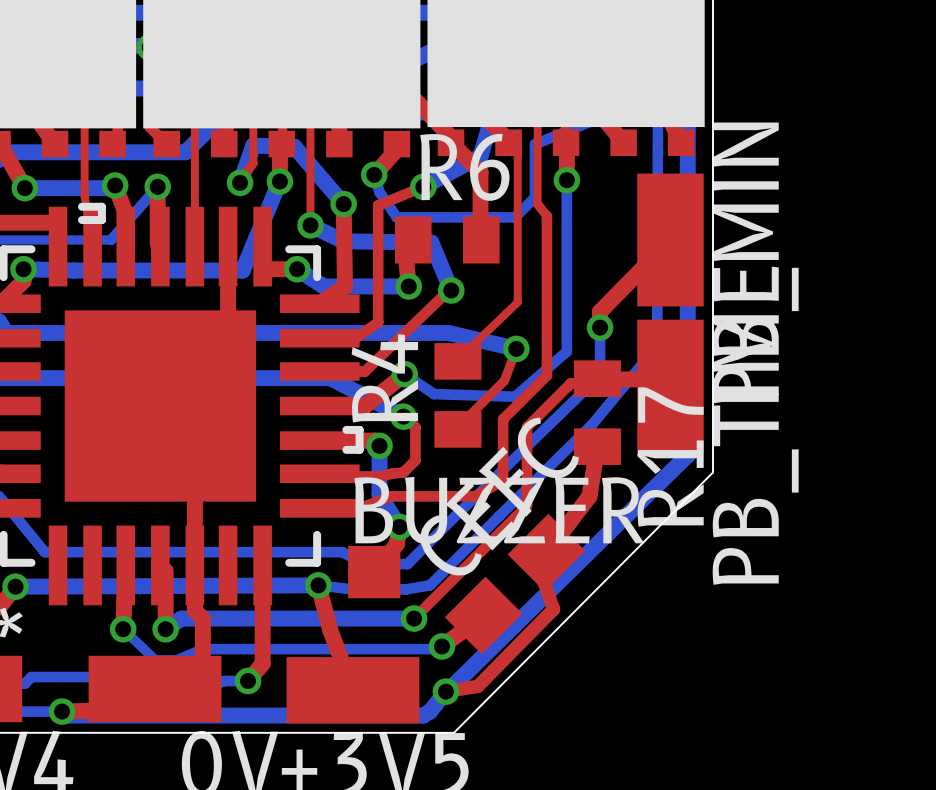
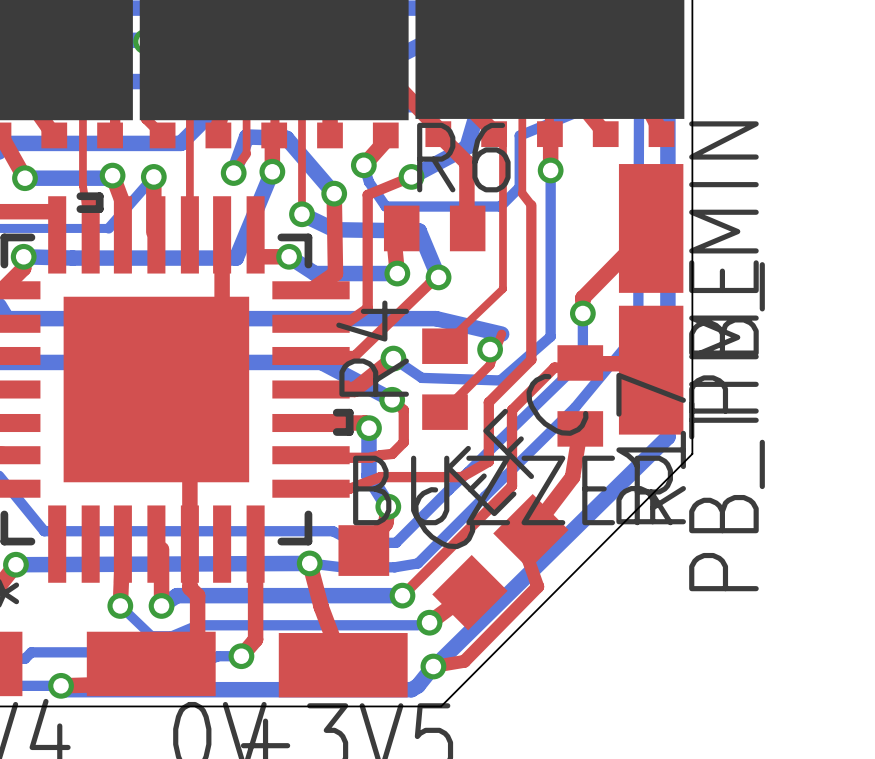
via position: (516, 348) -> (490, 349)

